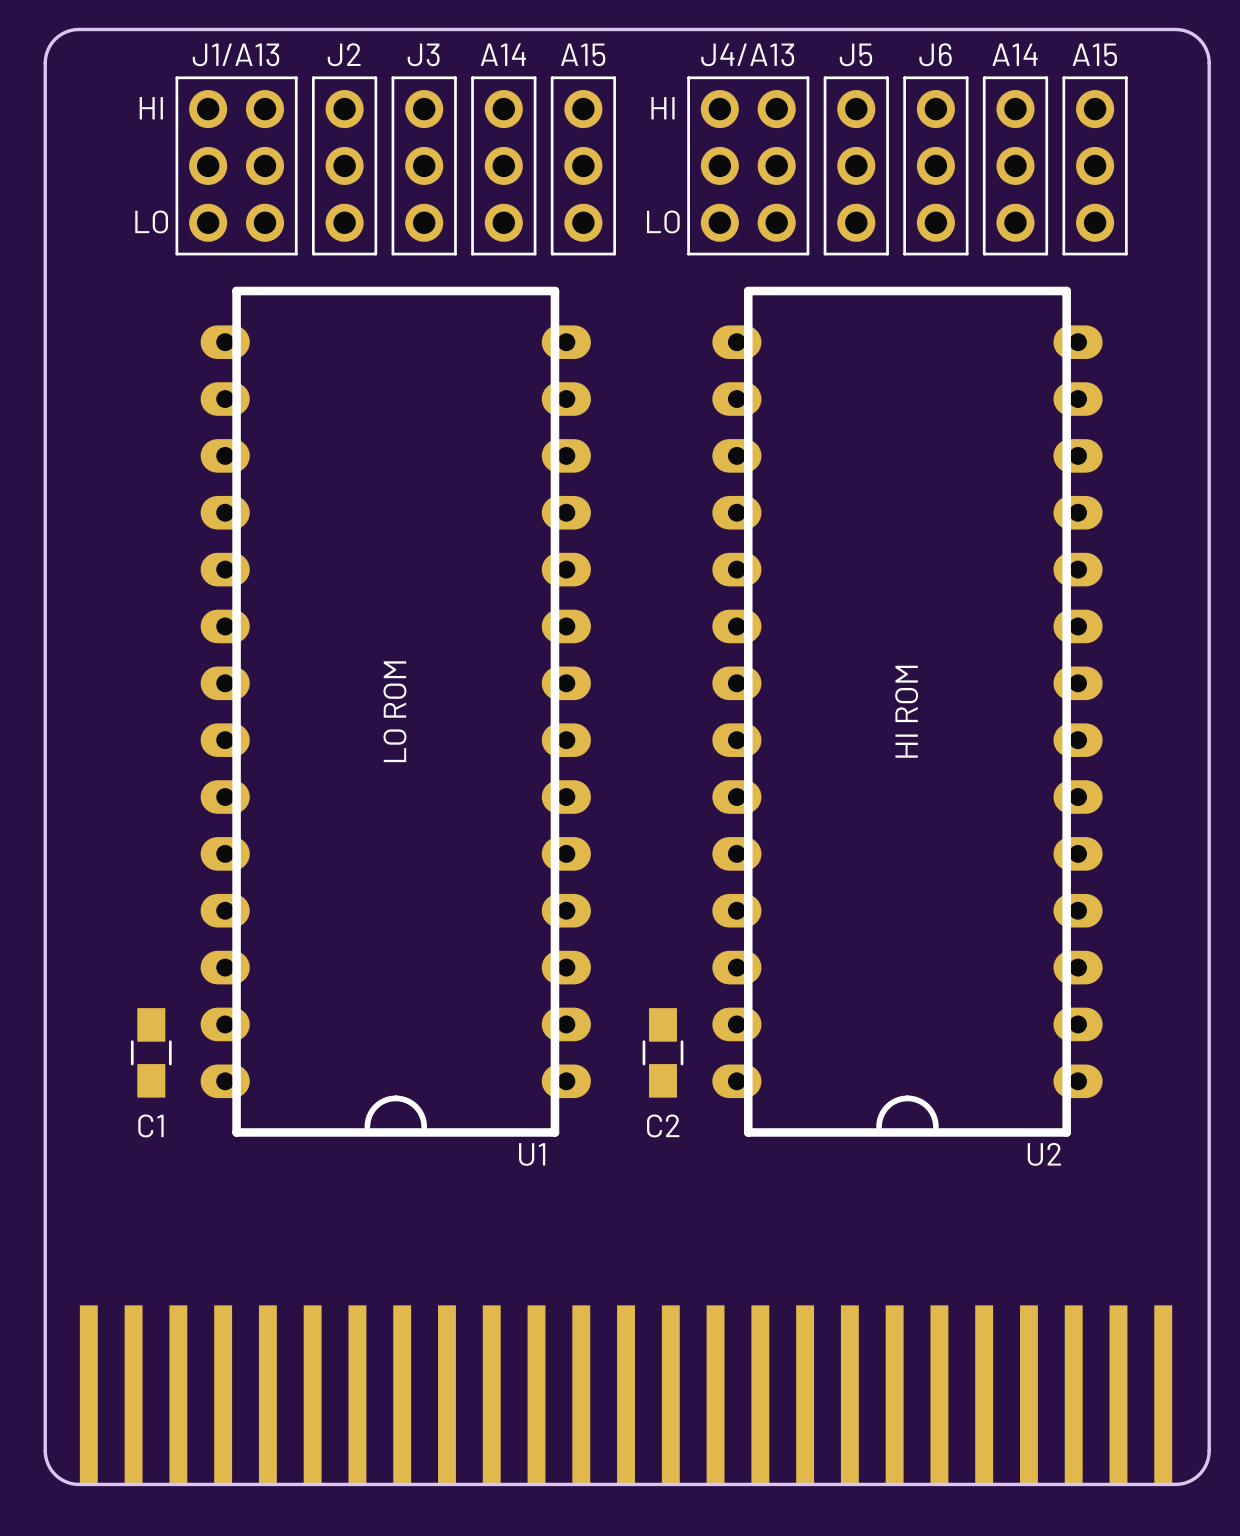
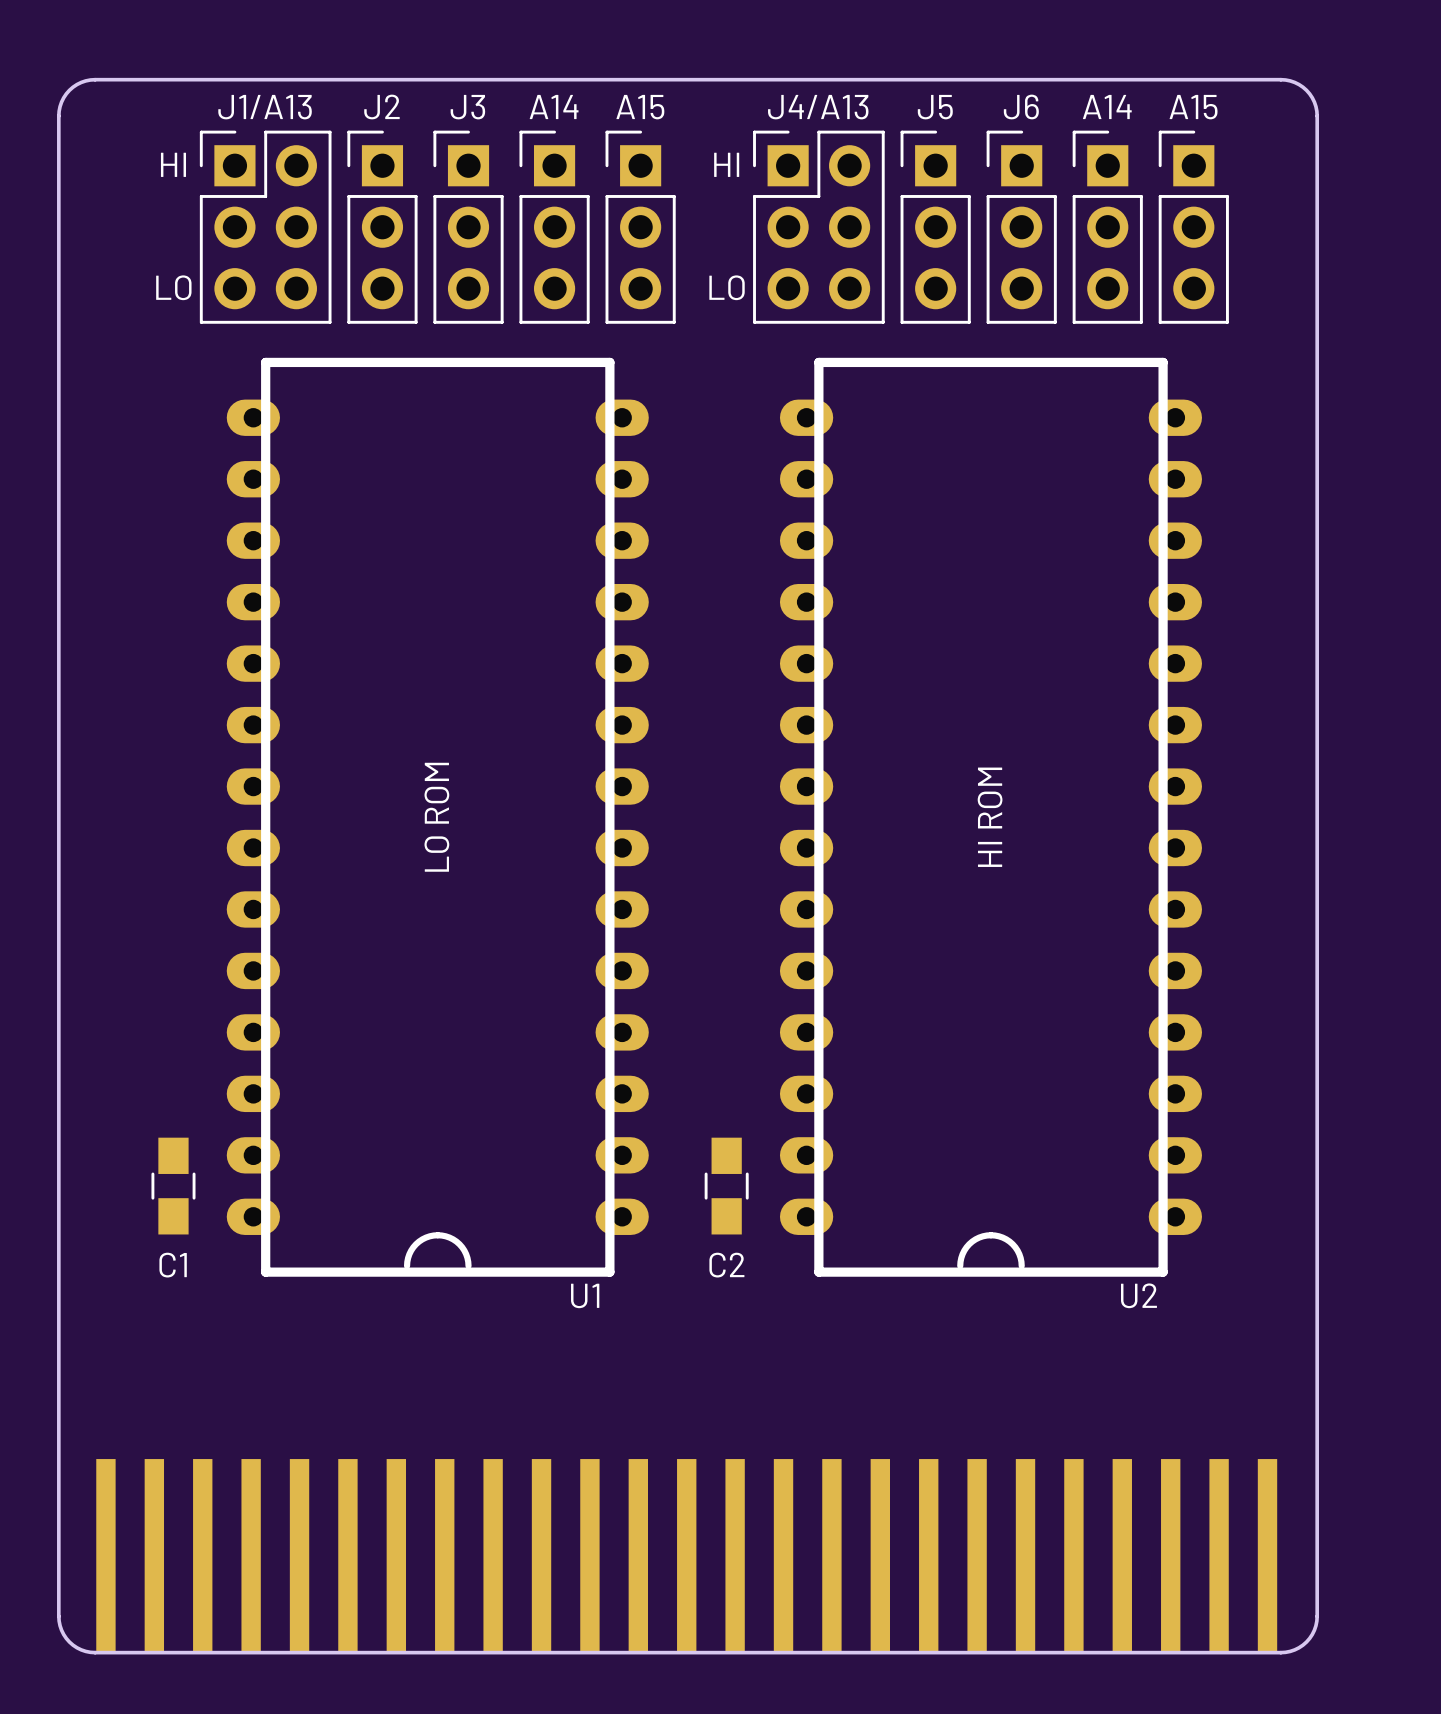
part footprint: [175, 76, 298, 256] -> [199, 130, 332, 324]
J2 footprint: [311, 76, 378, 256] -> [347, 130, 418, 324]
J3 footprint: [391, 76, 457, 256] -> [433, 130, 504, 324]
part footprint: [471, 76, 537, 256] -> [519, 130, 590, 324]
part footprint: [550, 76, 617, 256] -> [605, 130, 676, 324]
part footprint: [687, 76, 810, 256] -> [753, 130, 885, 324]
J5 footprint: [823, 76, 889, 256] -> [900, 130, 971, 324]
J6 footprint: [903, 76, 969, 256] -> [986, 130, 1057, 324]
part footprint: [982, 76, 1049, 256] -> [1072, 130, 1143, 324]
part footprint: [1062, 76, 1128, 256] -> [1158, 130, 1229, 324]

